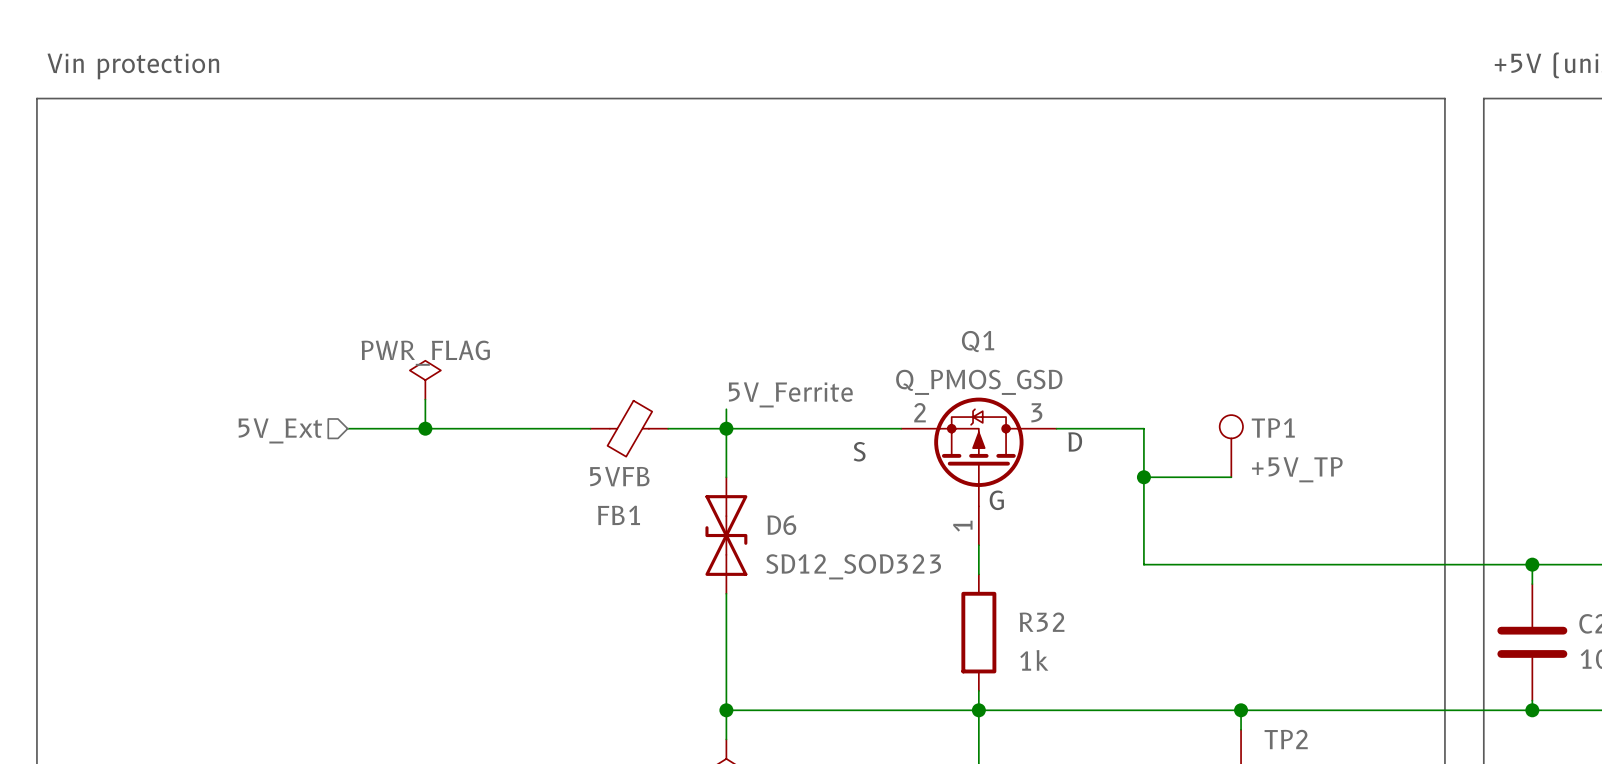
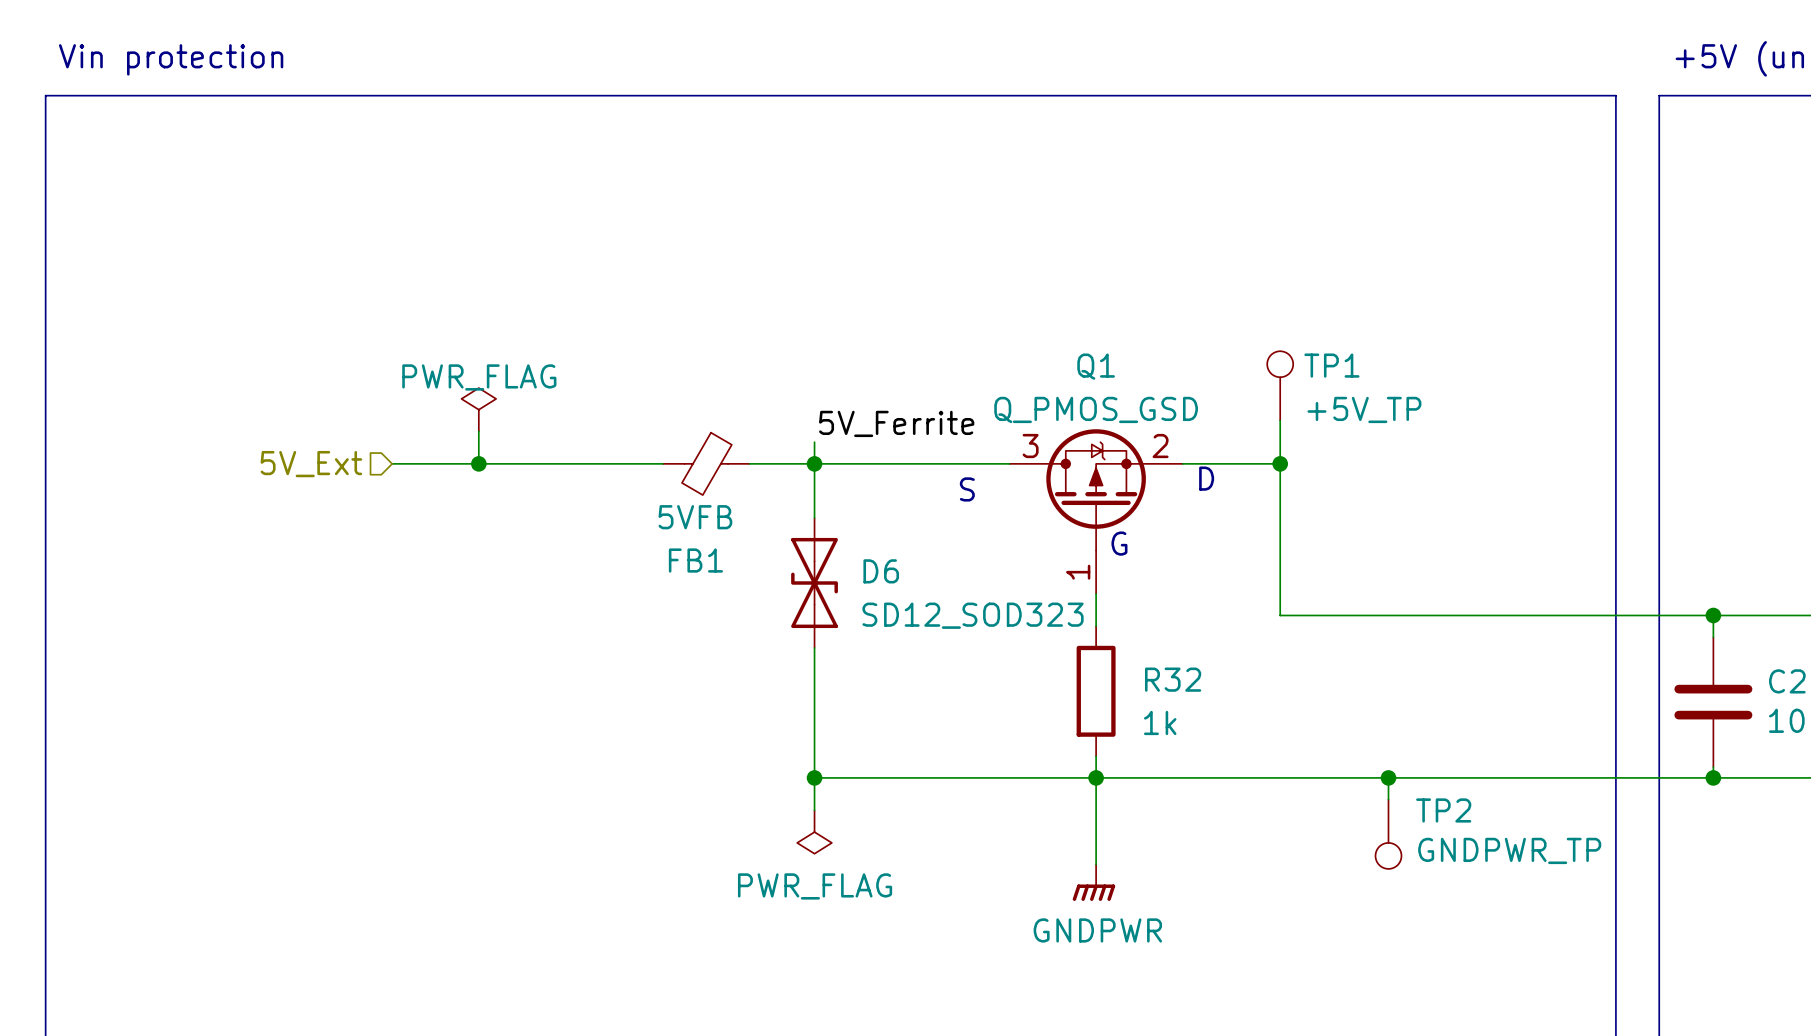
wire: none -> (1280, 420) (1280, 463)
TP1 position: (1231, 446) -> (1280, 385)
Q1 flip: as is (978, 452) -> left-right (1096, 489)
wire: (1143, 477) (1231, 477) -> none
junction position: (1143, 477) -> (1280, 463)

